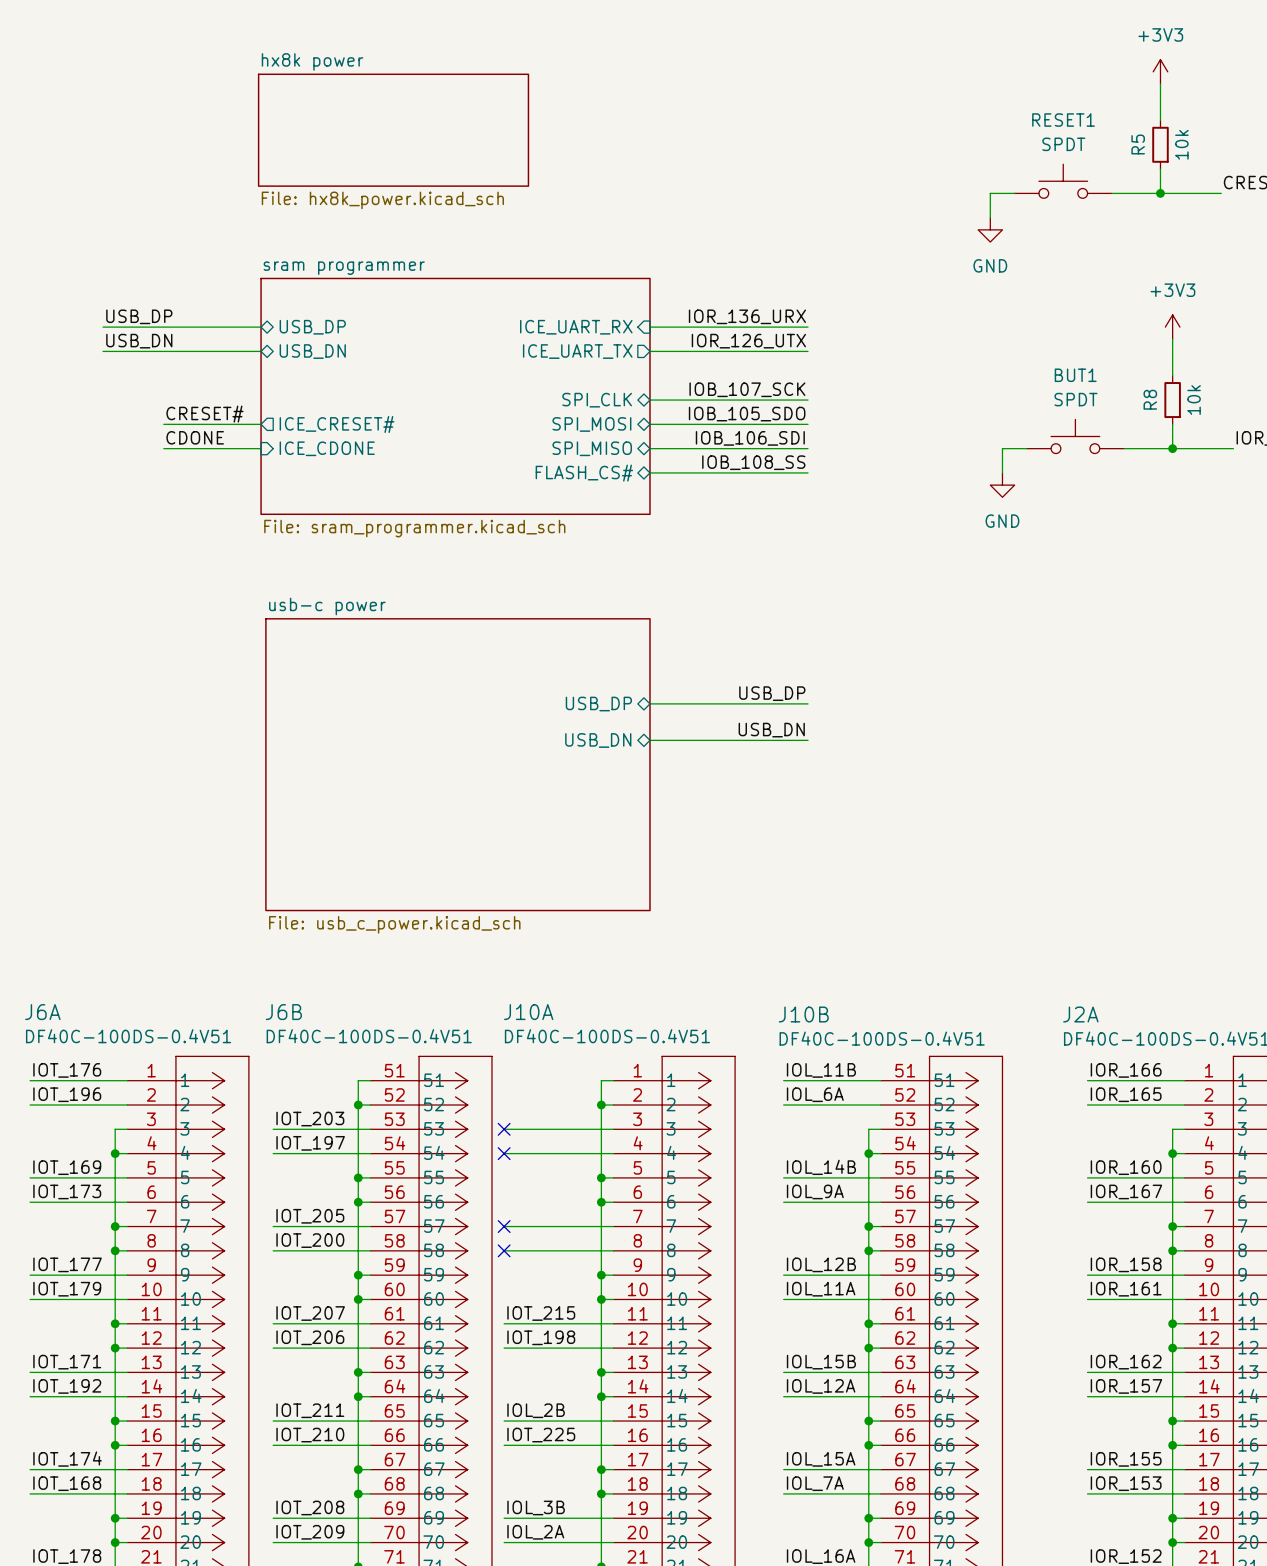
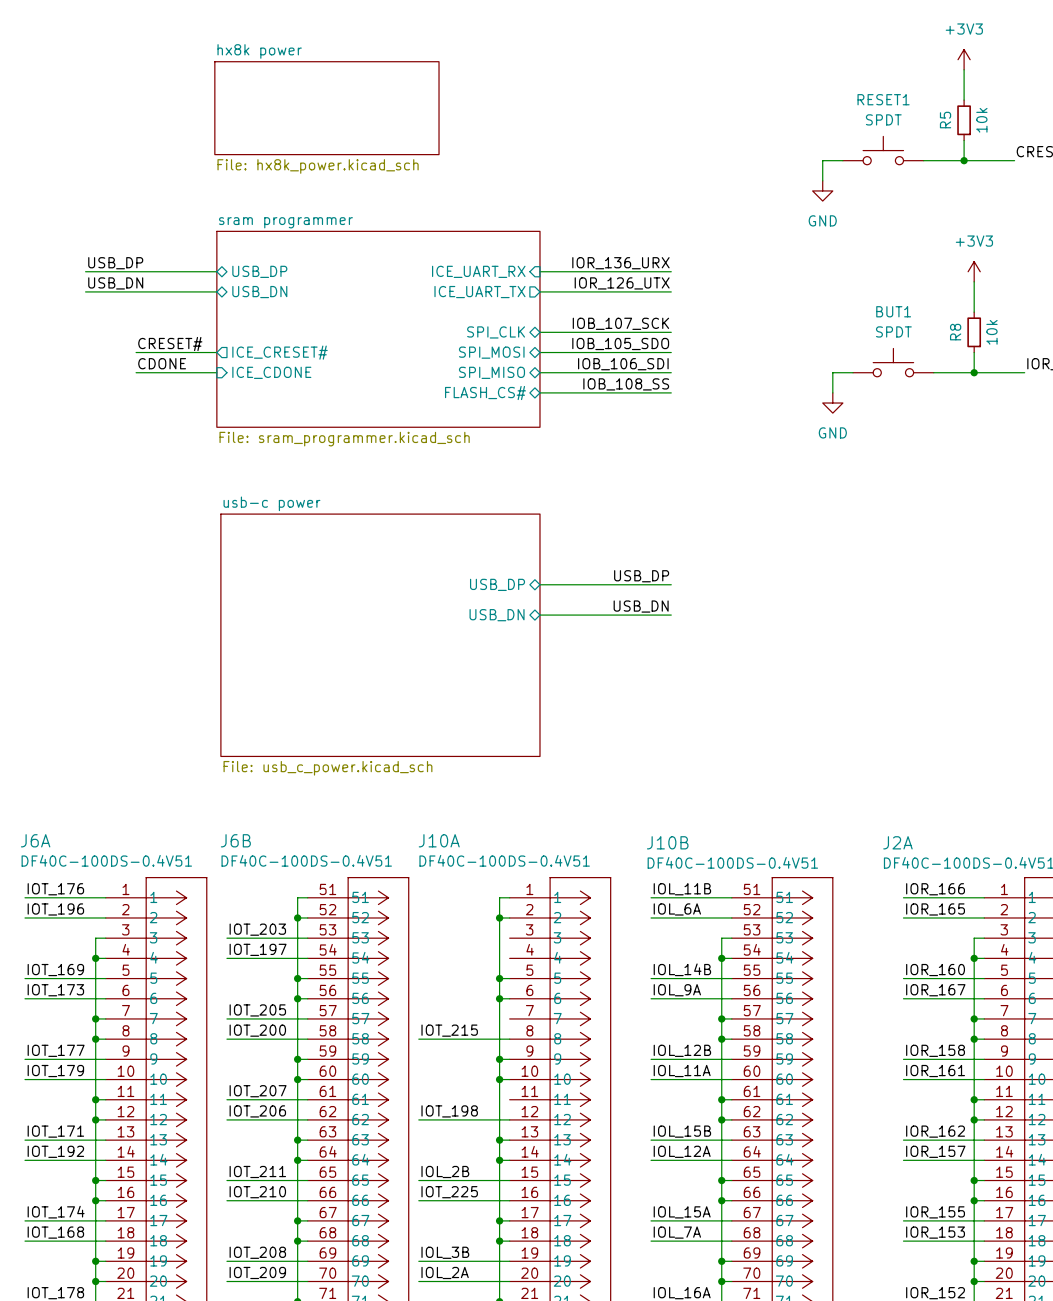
wire: (504, 1129) (613, 1129) -> none
no-connect mark: (504, 1129) -> none
wire: (504, 1153) (613, 1153) -> none
no-connect mark: (504, 1153) -> none
wire: (504, 1226) (613, 1226) -> none
no-connect mark: (504, 1226) -> none
no-connect mark: (504, 1250) -> none
label position: IOT_215 (541, 1313) -> IOT_215 (449, 1030)
wire: (504, 1323) (613, 1323) -> none

